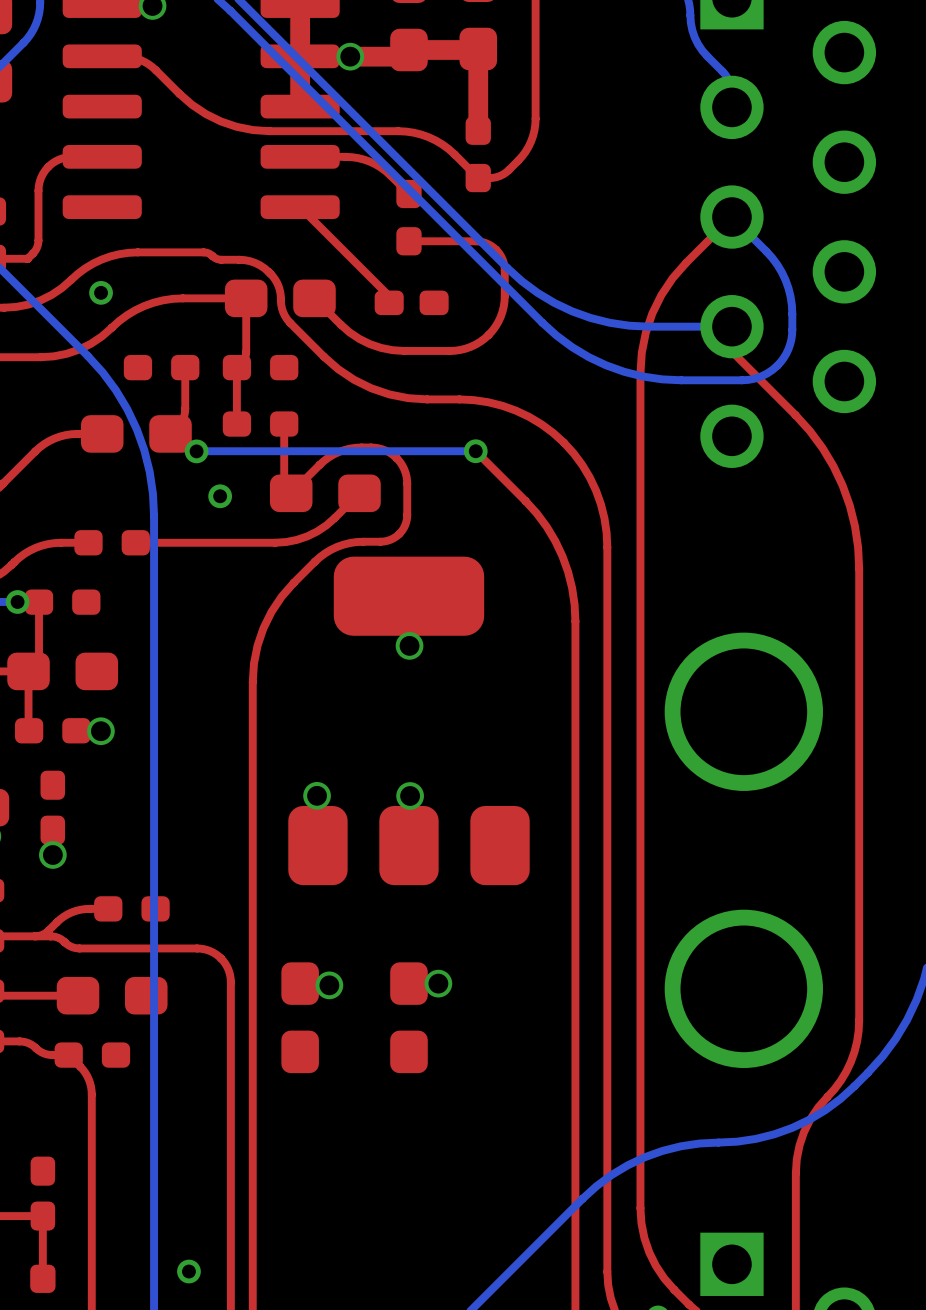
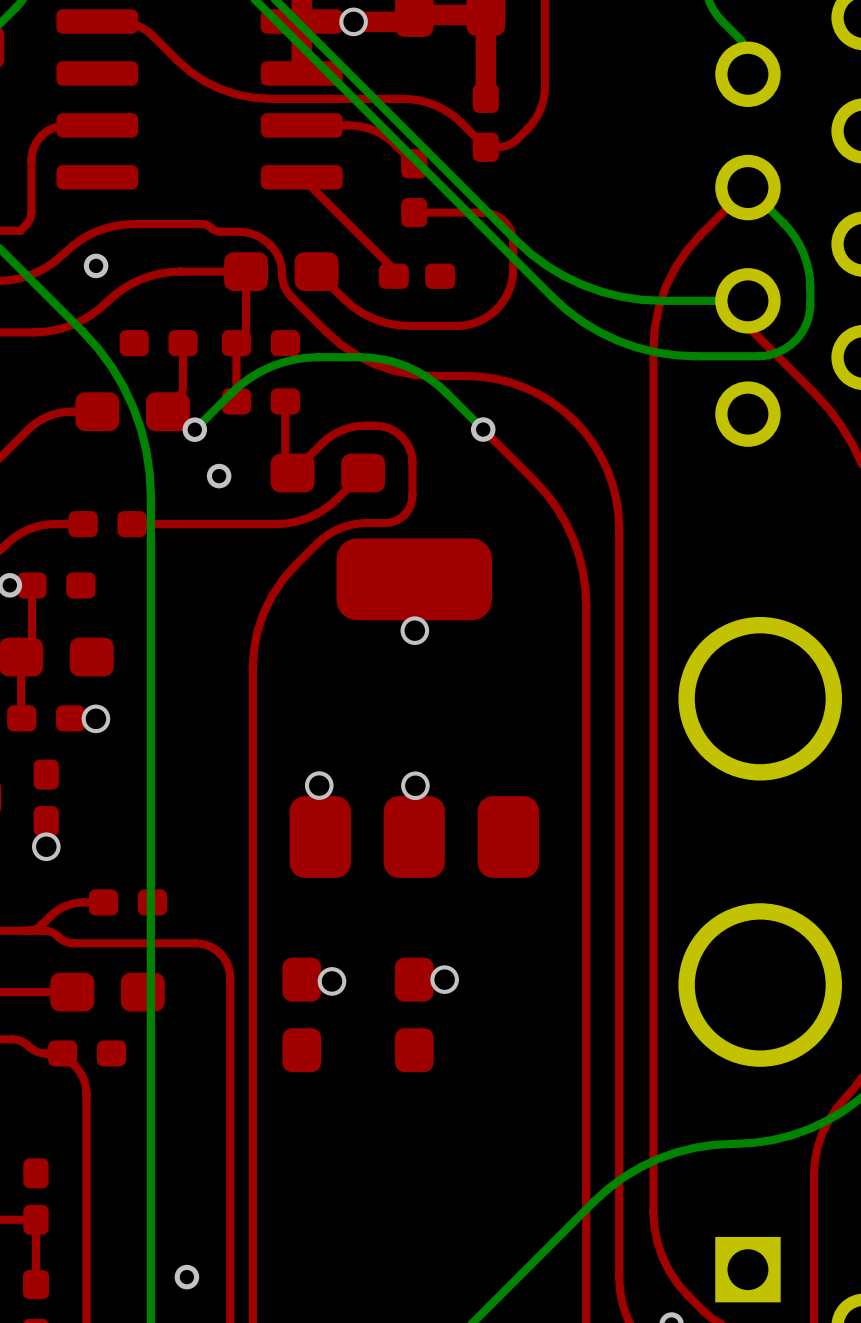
bottom track: (475, 451) (196, 451) -> (483, 429) (438, 385) (407, 366) (371, 357) (318, 357) (294, 359) (260, 371) (240, 385) (194, 429)

